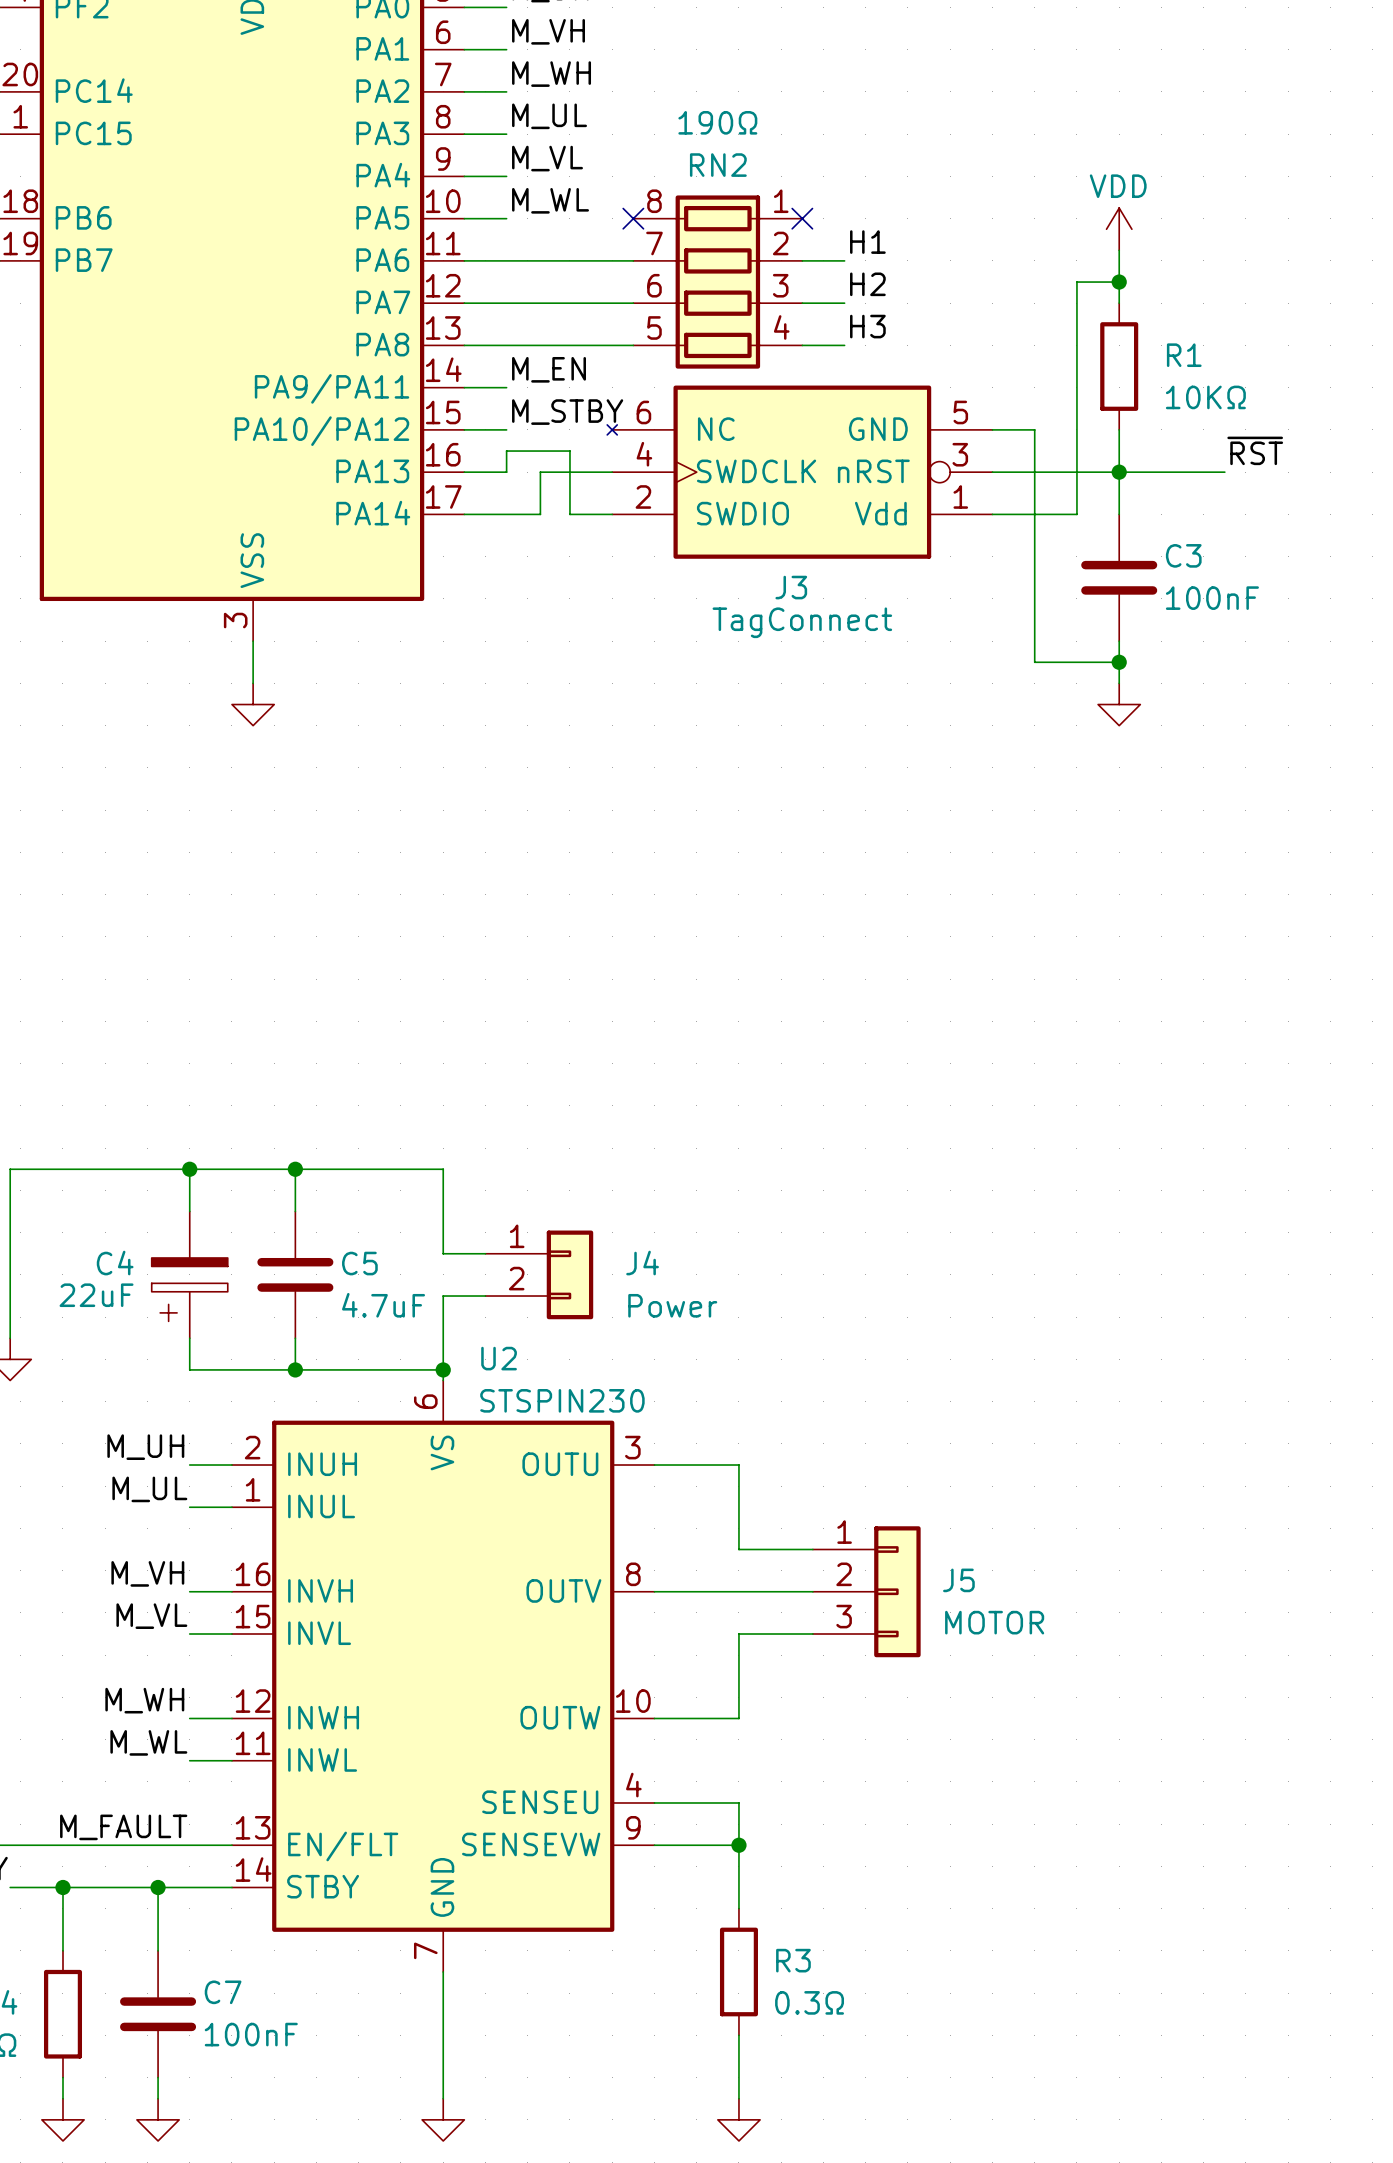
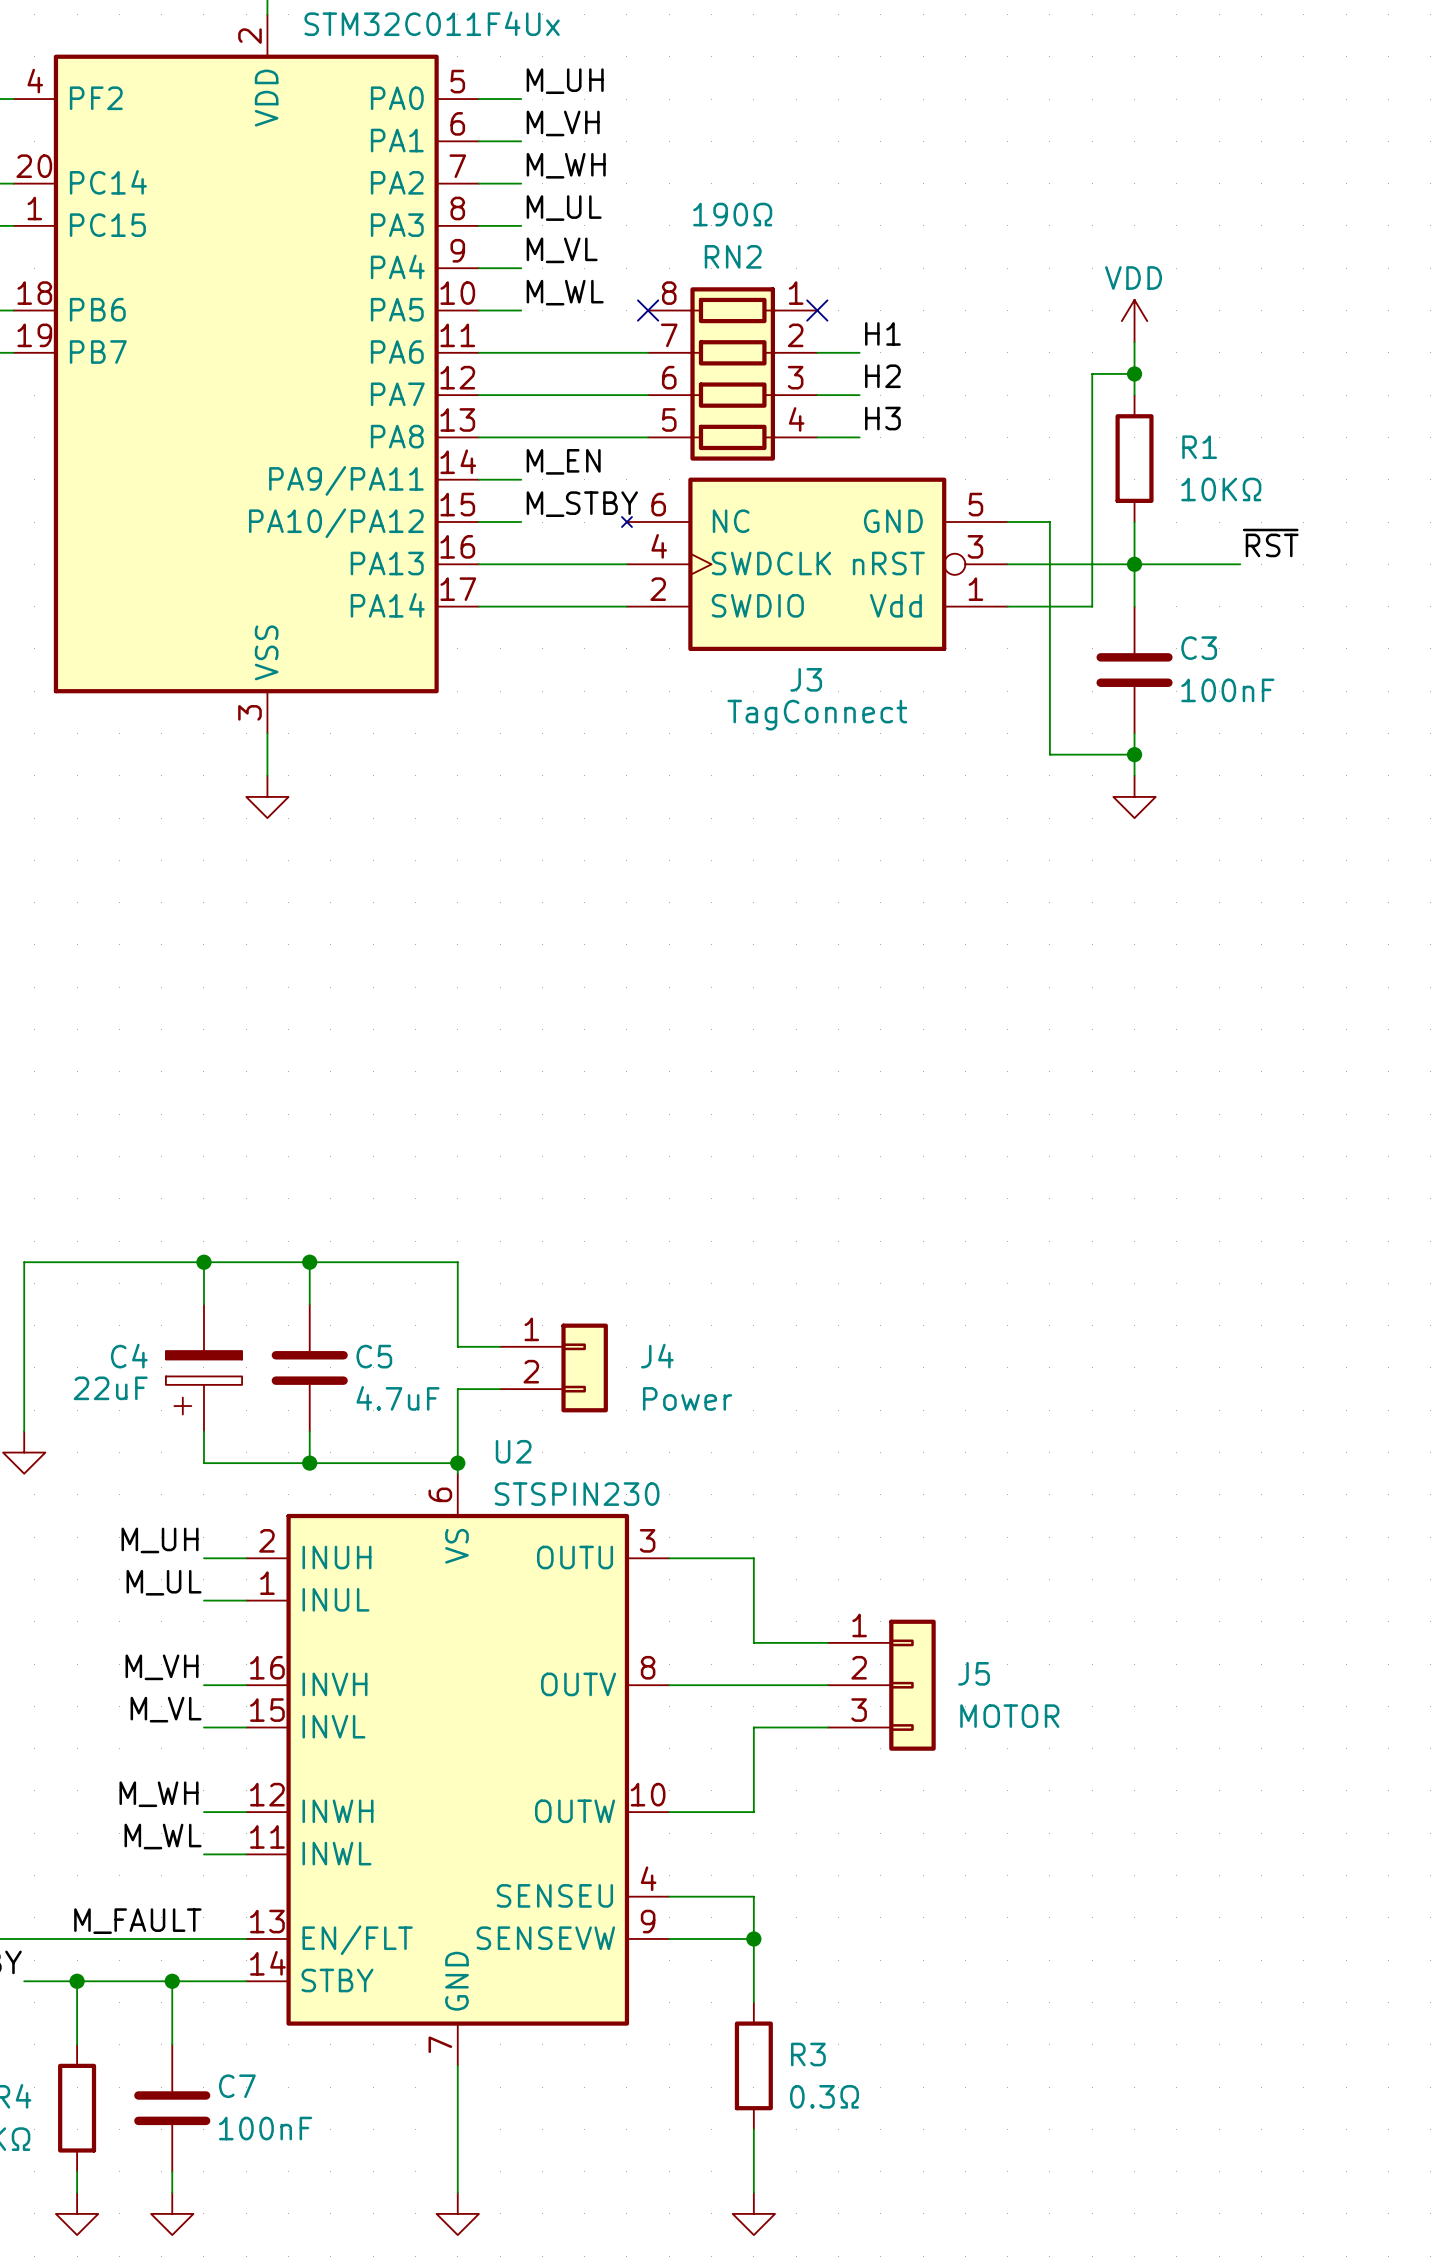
wire: (506, 472) (506, 451) (569, 451) (569, 514) -> (521, 564) (555, 564)
wire: (540, 472) (540, 514) -> (584, 606) (555, 606)

